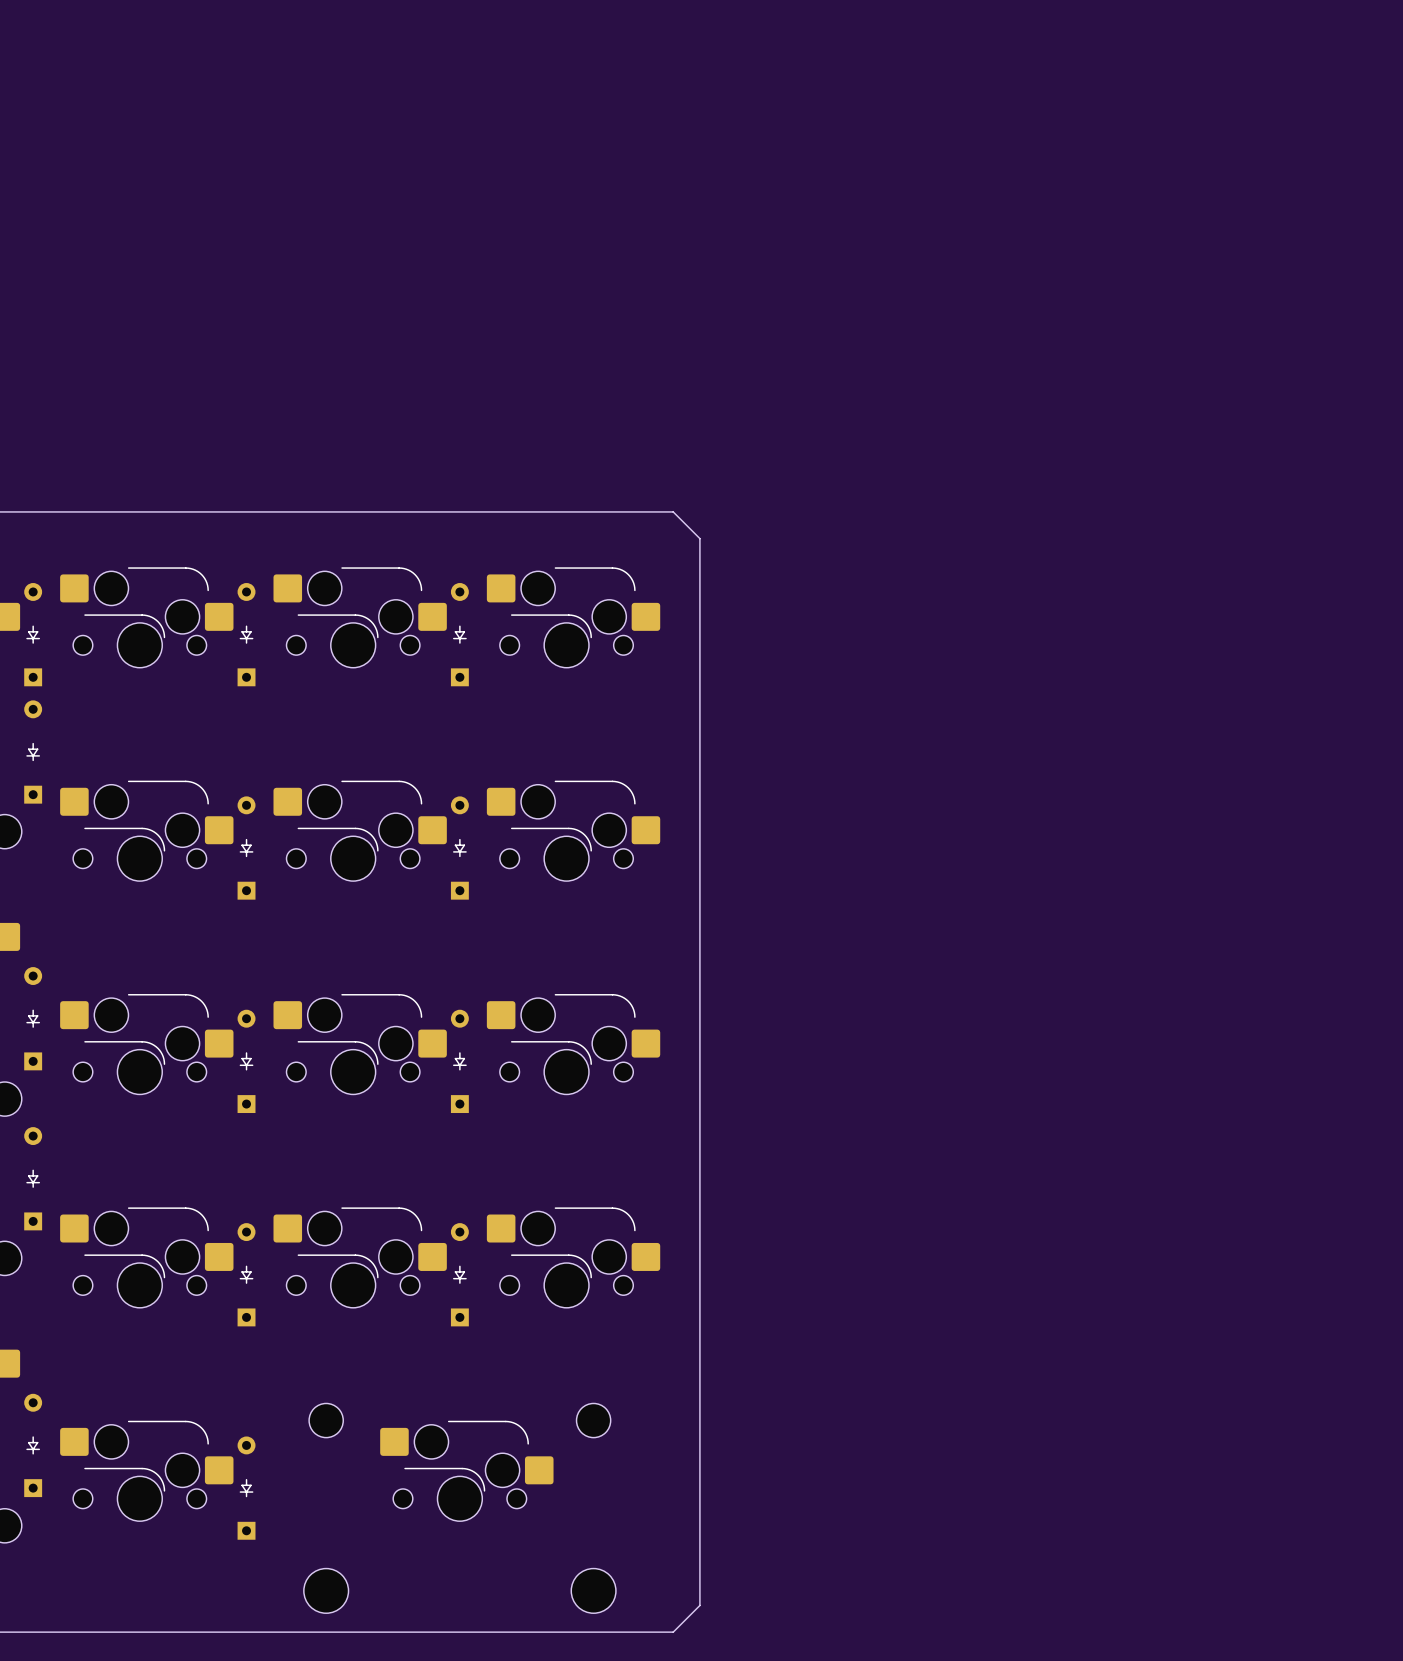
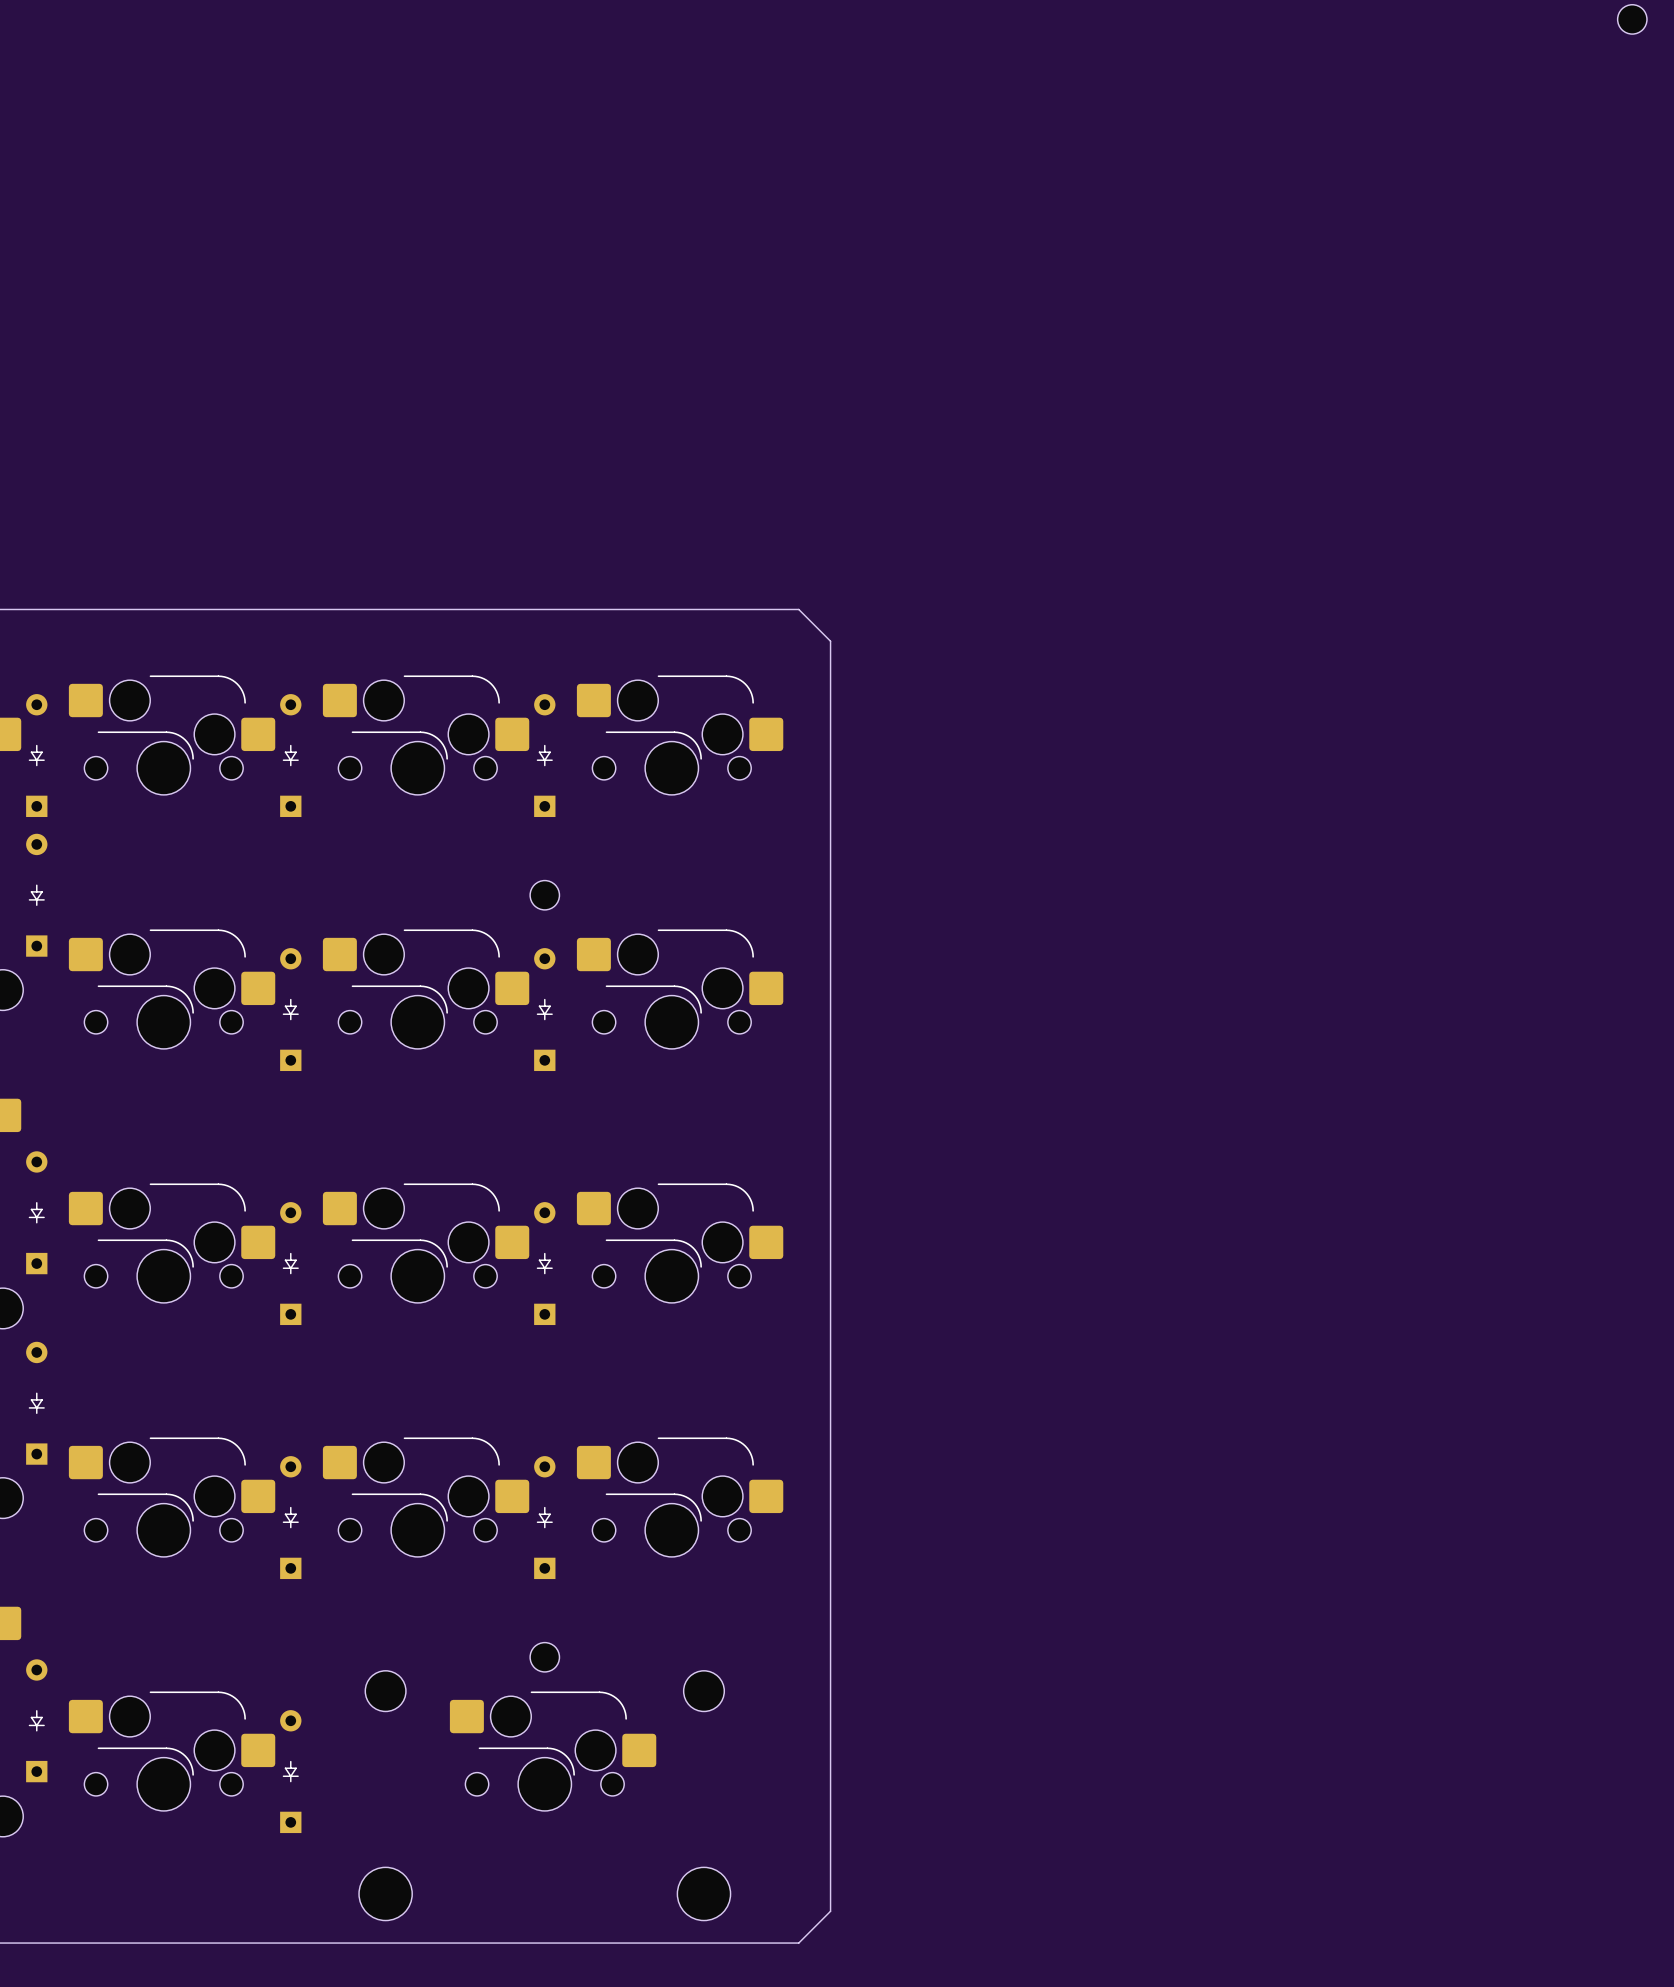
part: none -> (1632, 19)
part: none -> (544, 895)
part: none -> (544, 1657)

